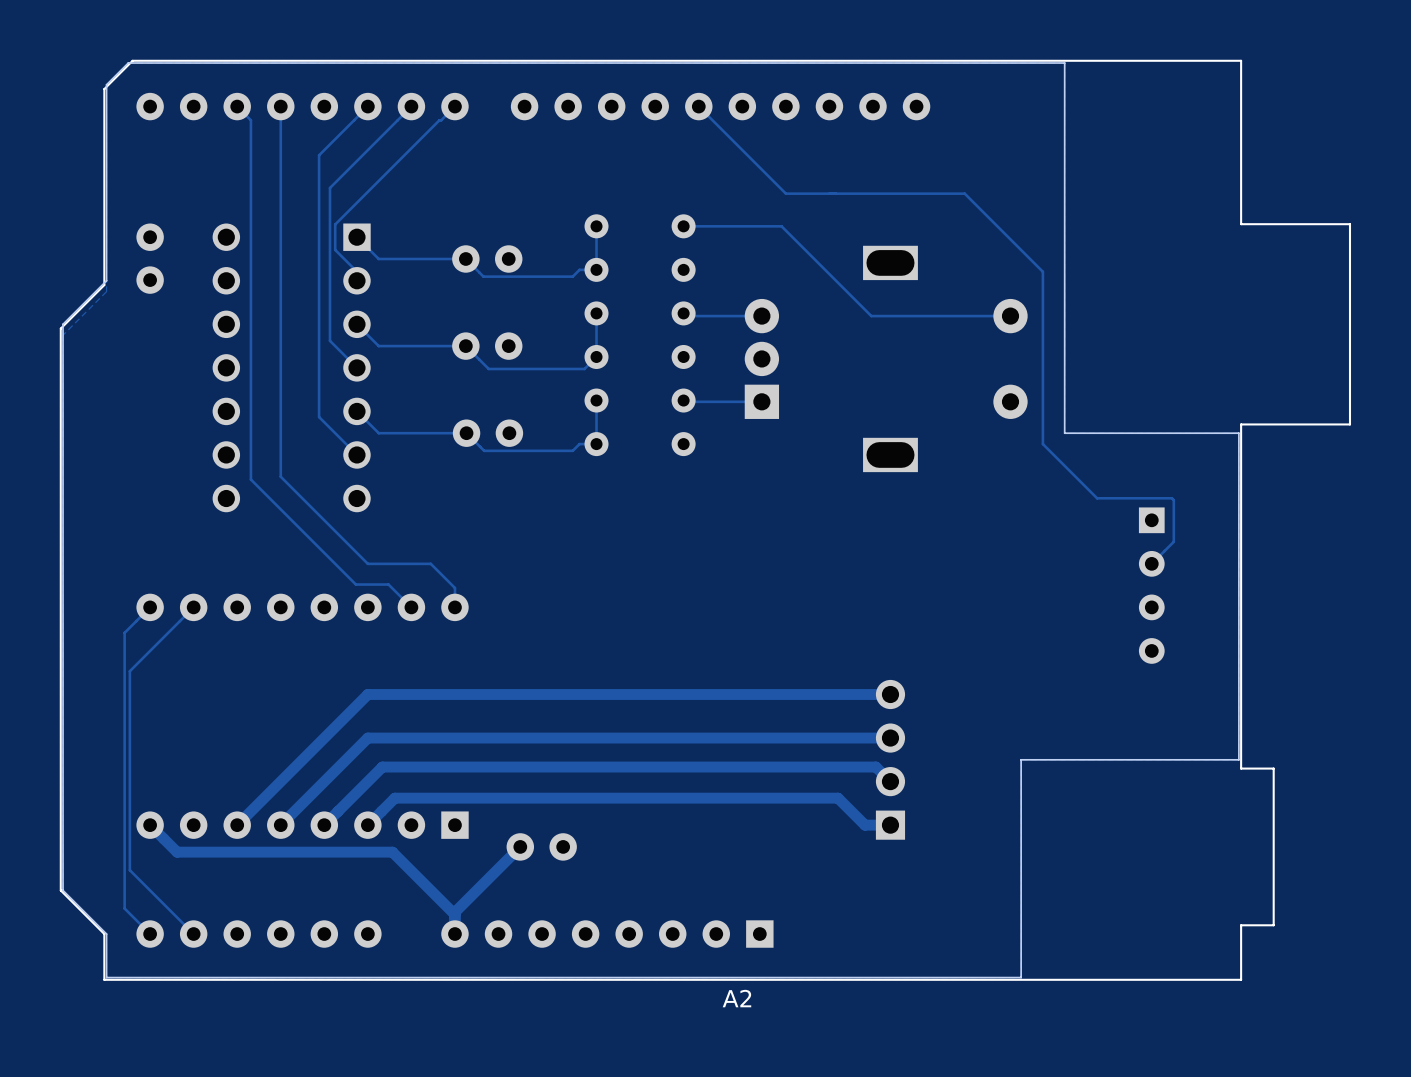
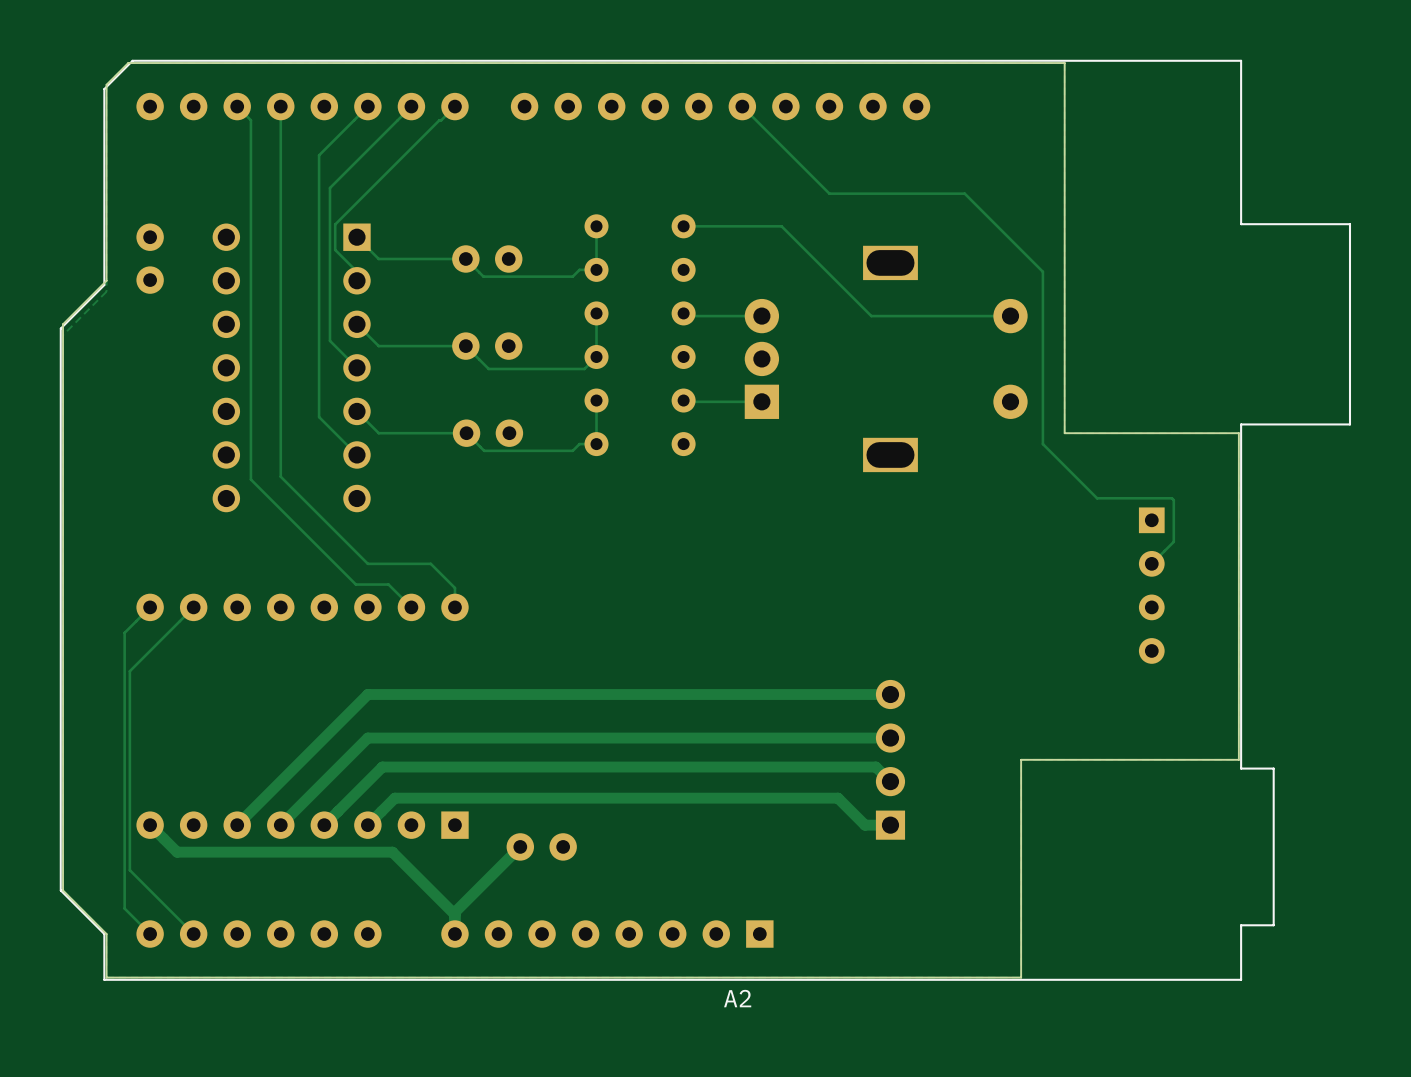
track: (698, 106) (785, 193) (829, 193) -> (742, 106) (829, 193)

